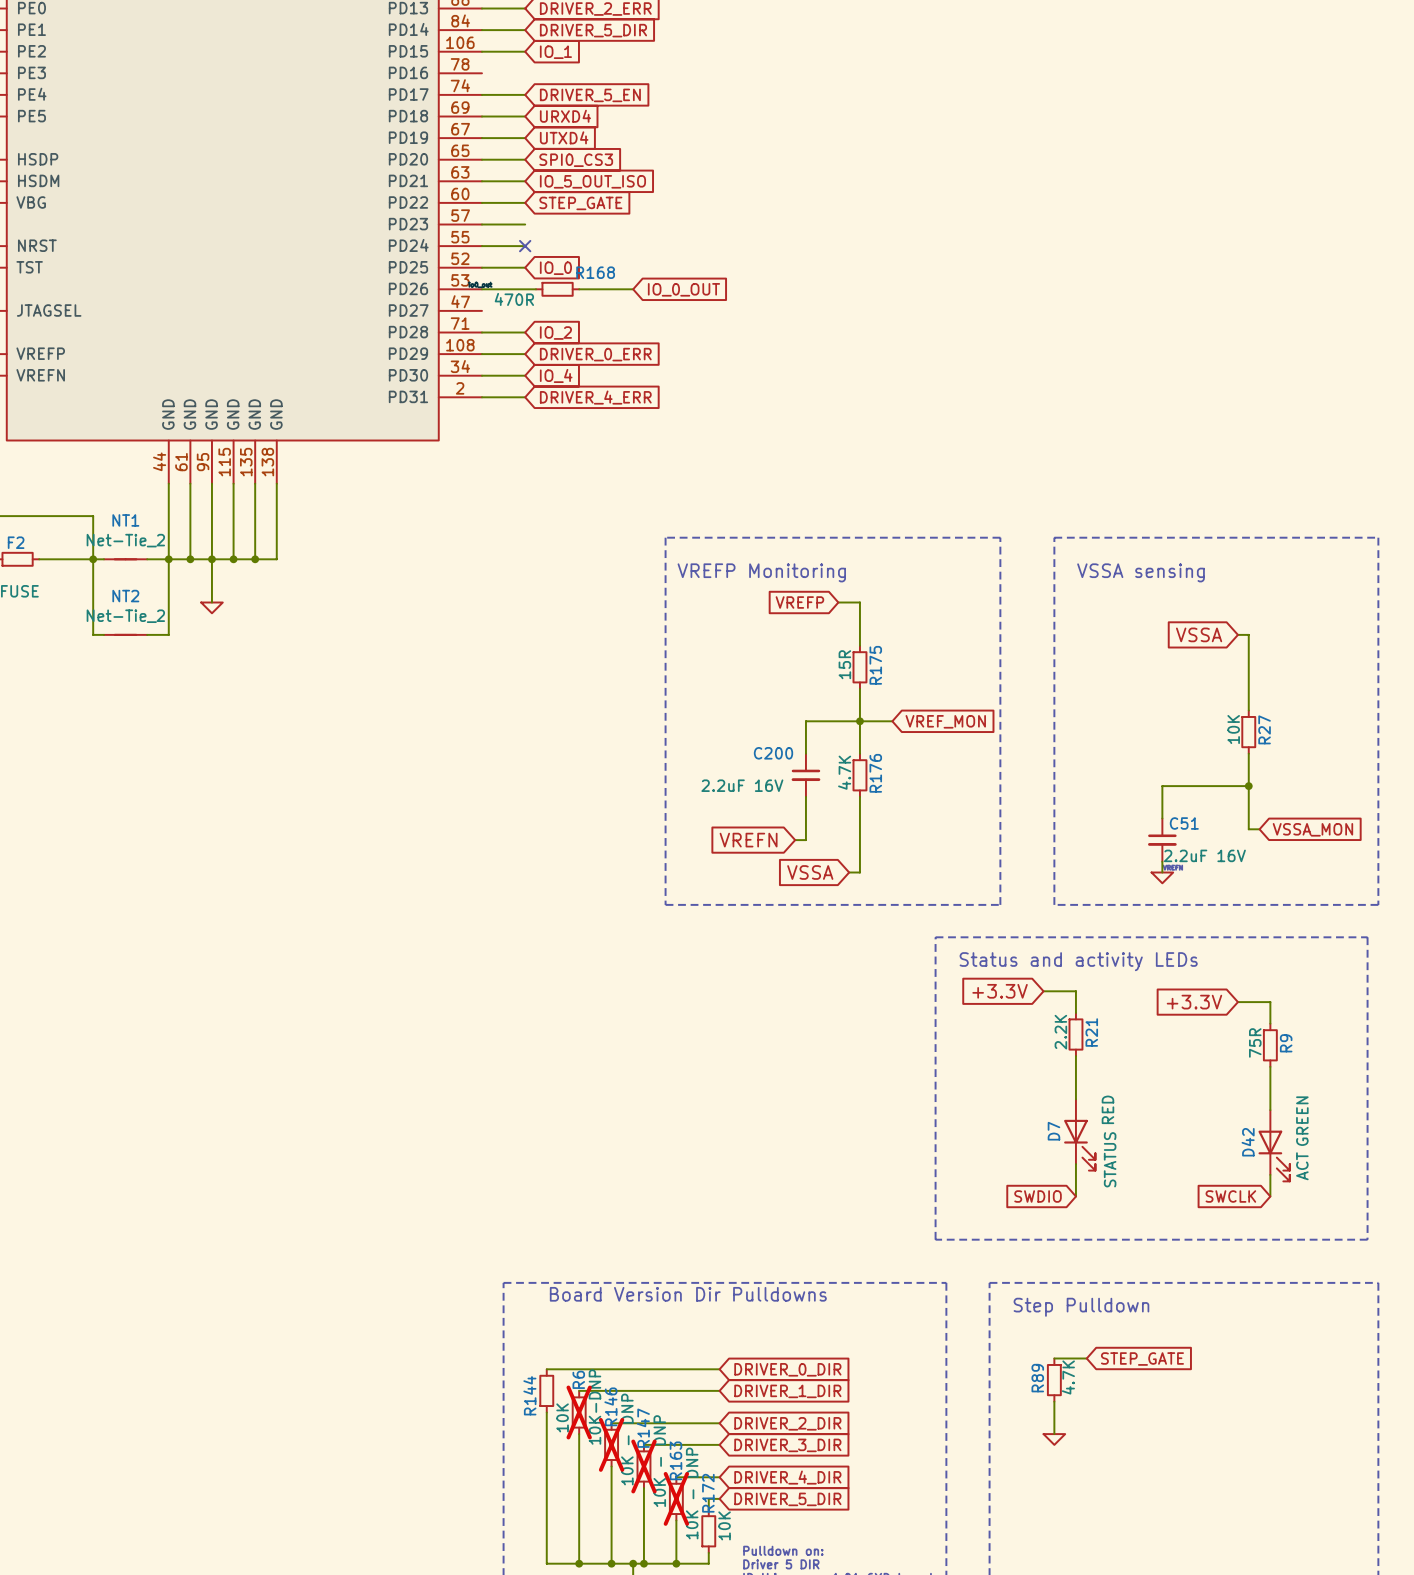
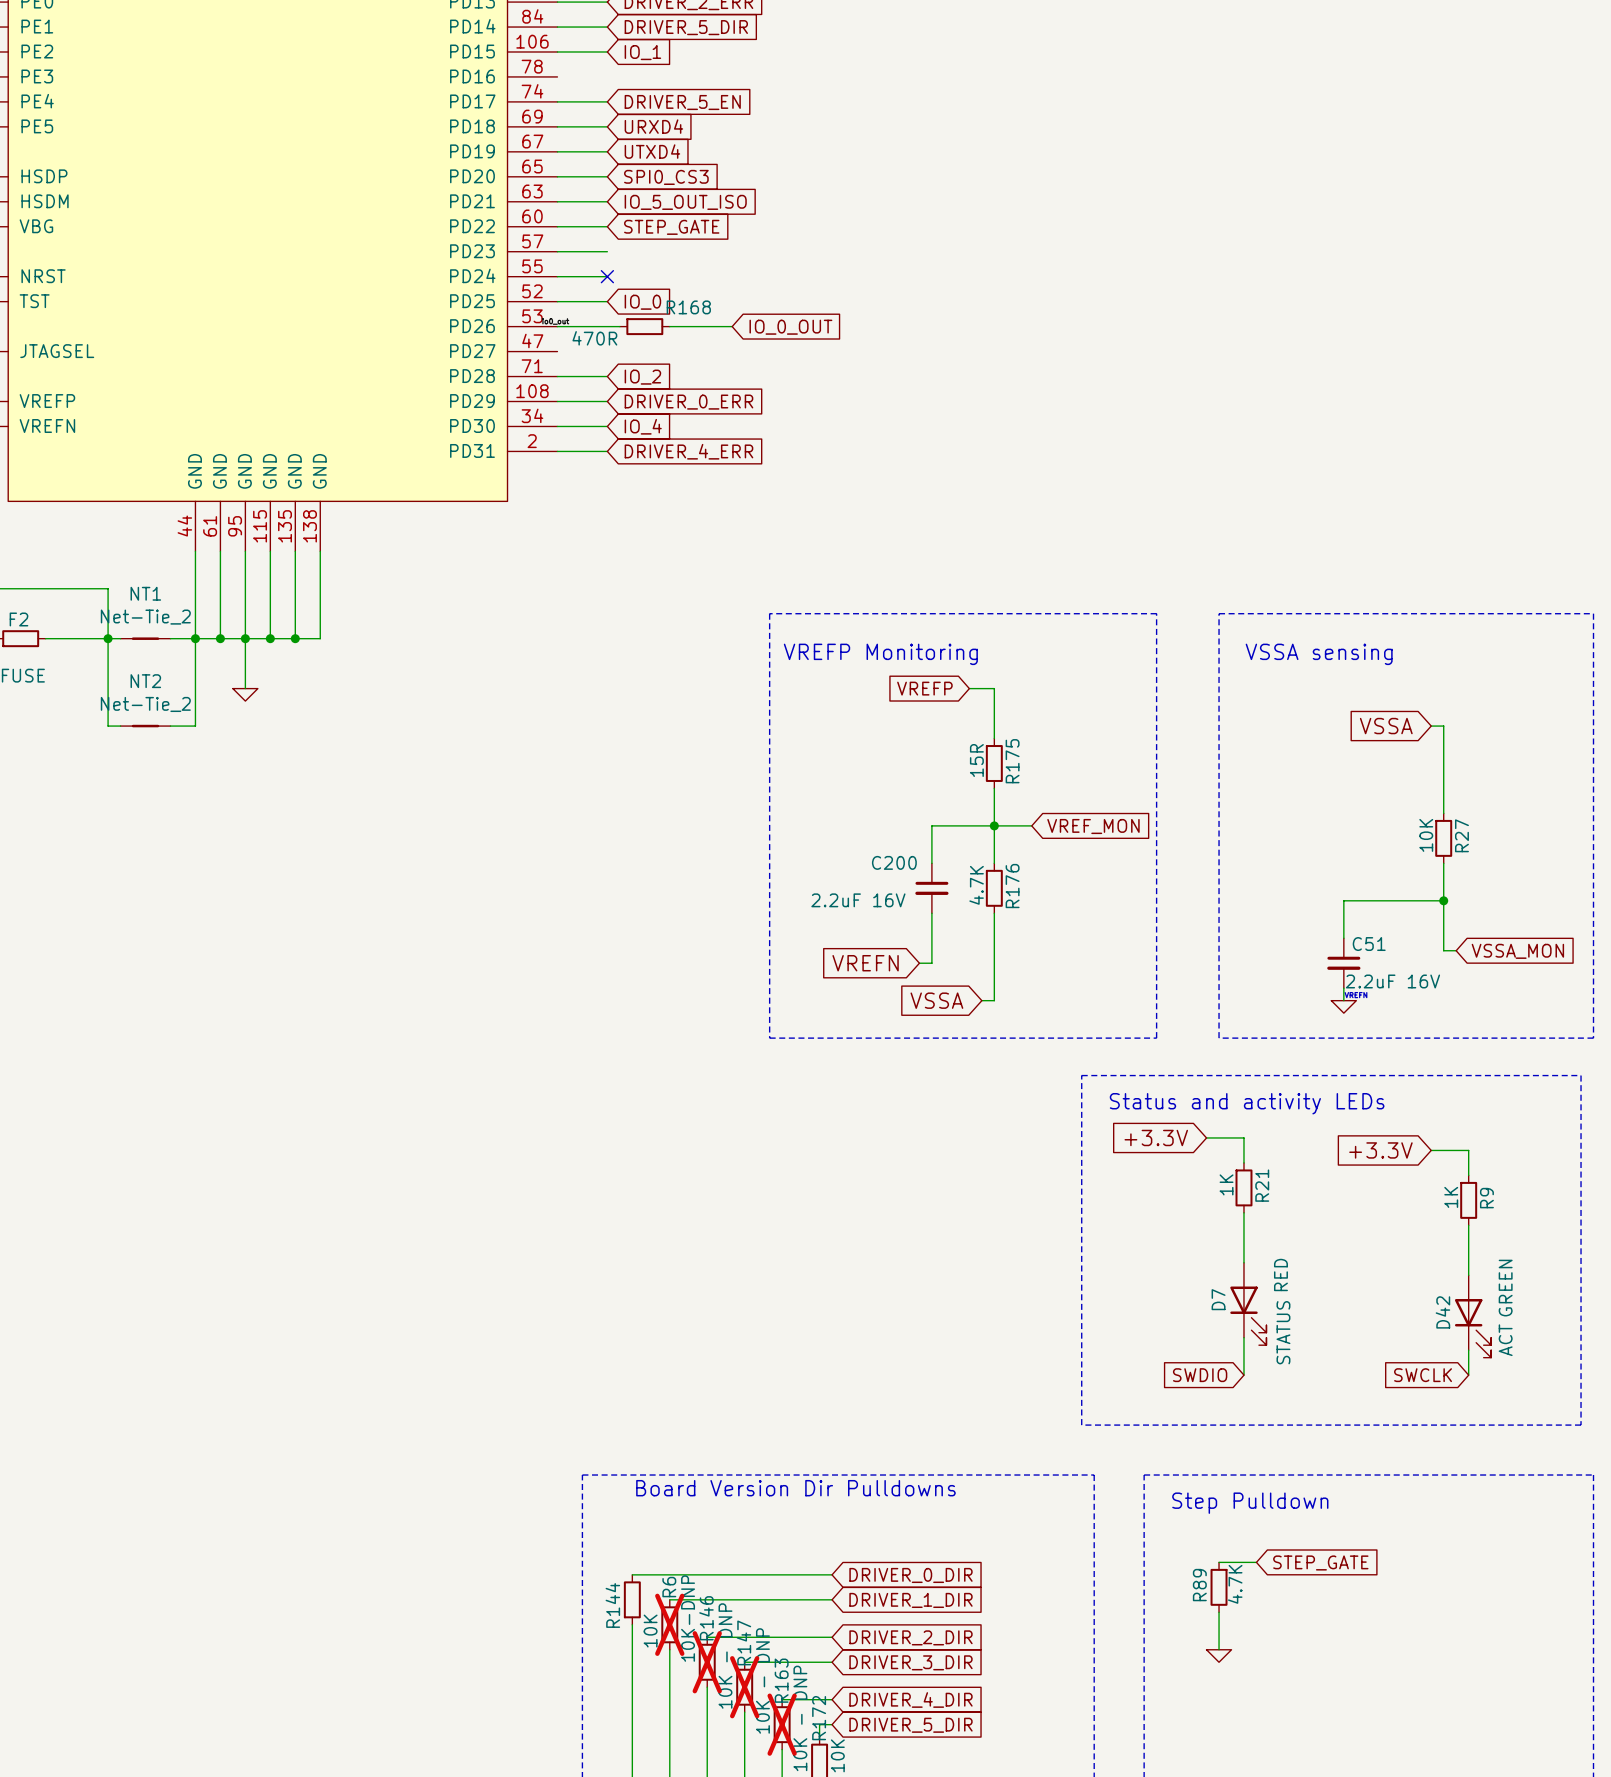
R21 value: 2.2K (1060, 1032) -> 1K (1226, 1184)
R9 value: 75R (1255, 1042) -> 1K (1451, 1197)

